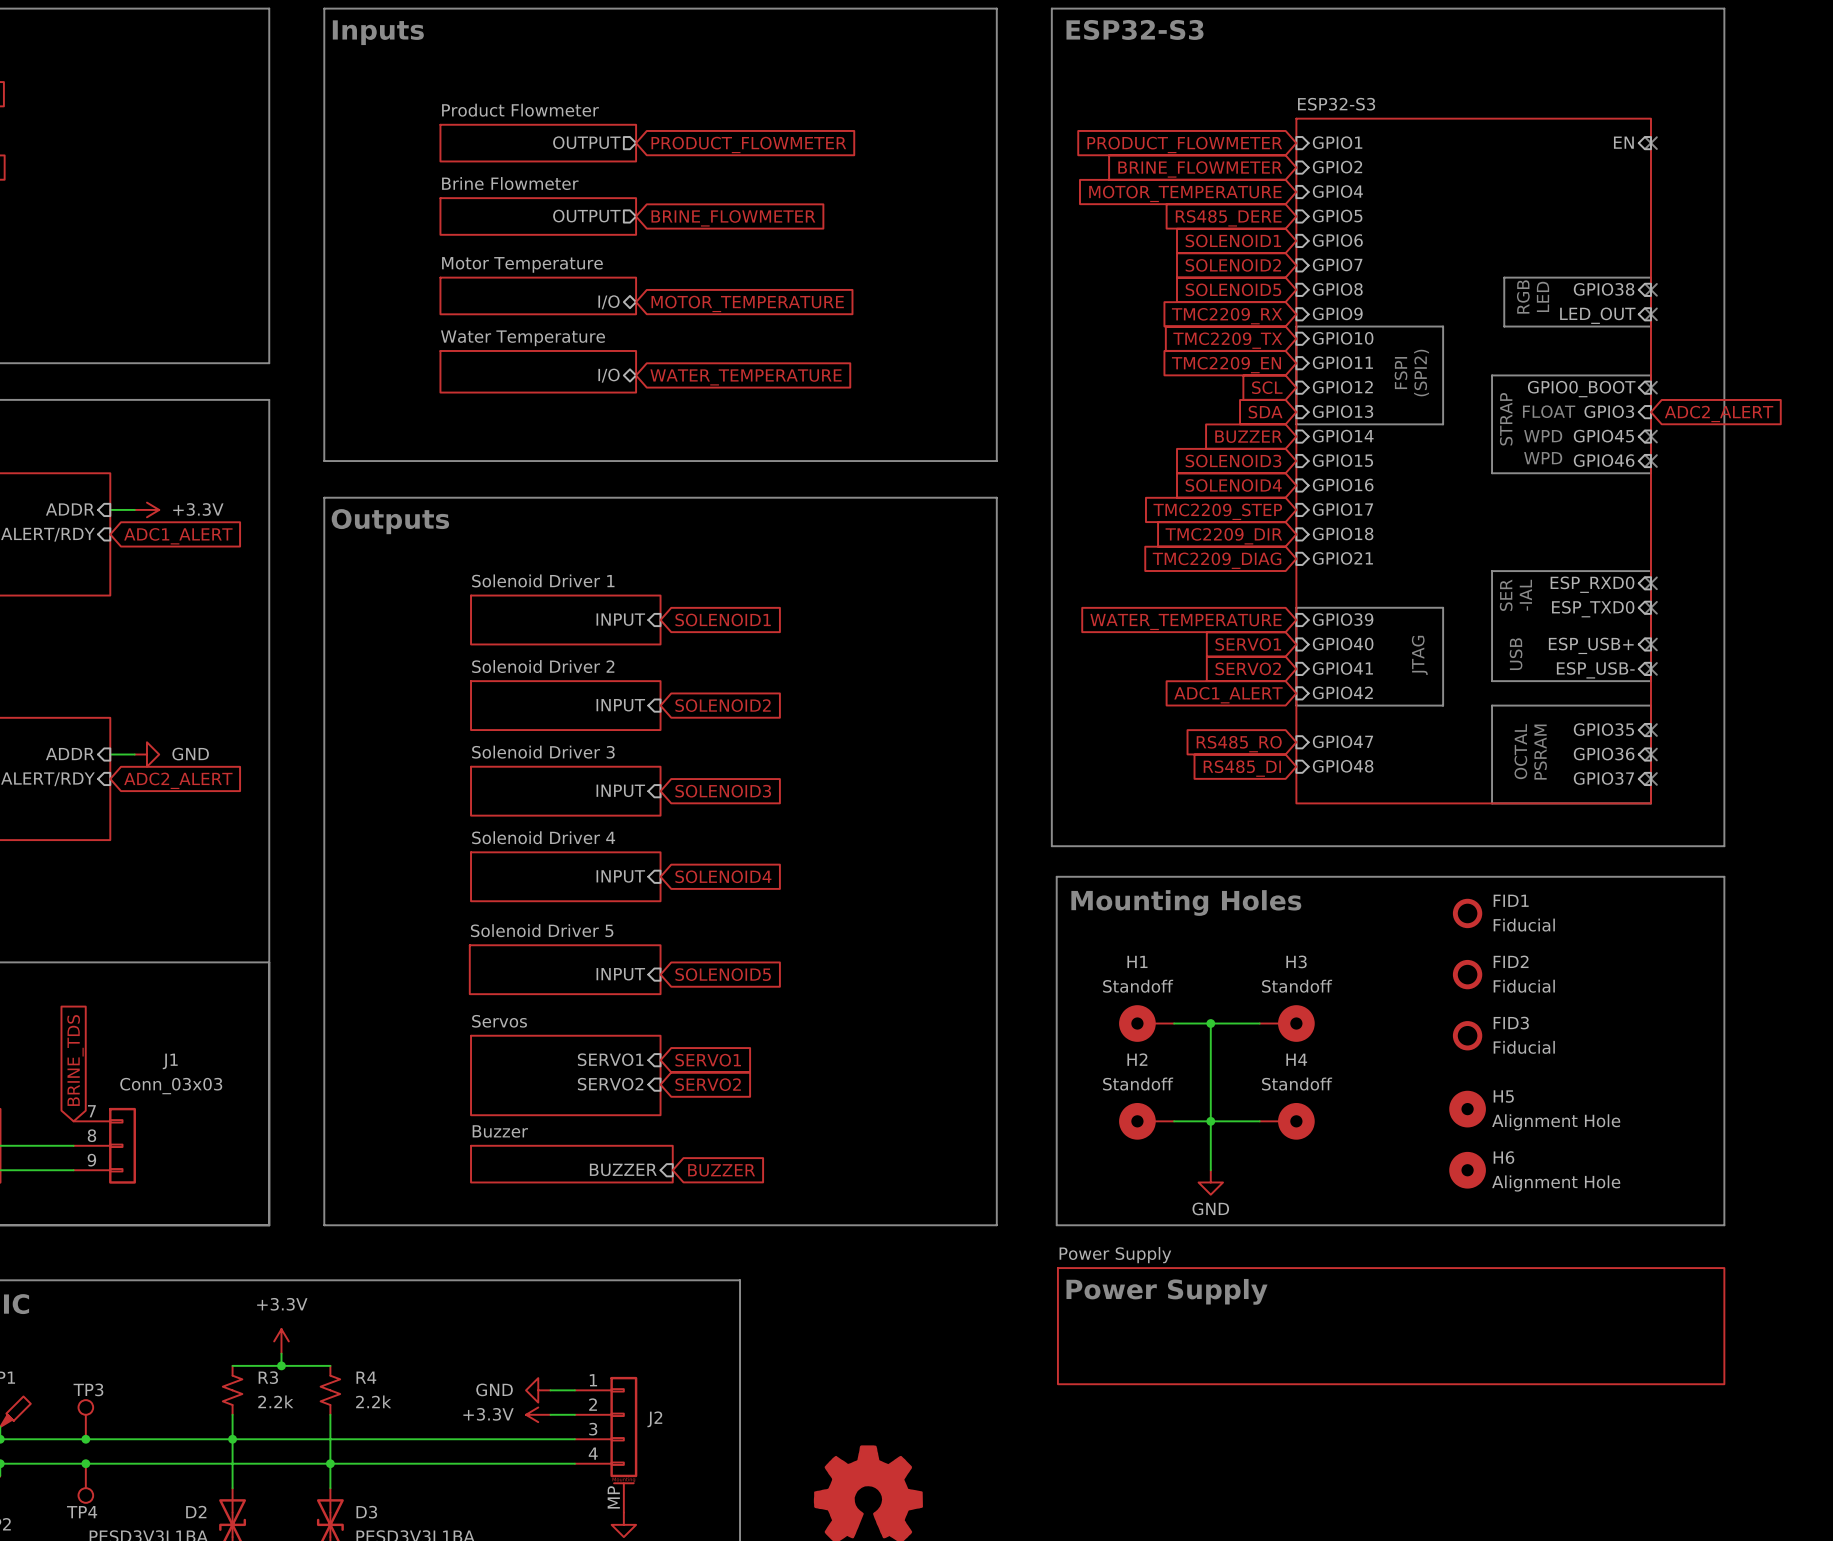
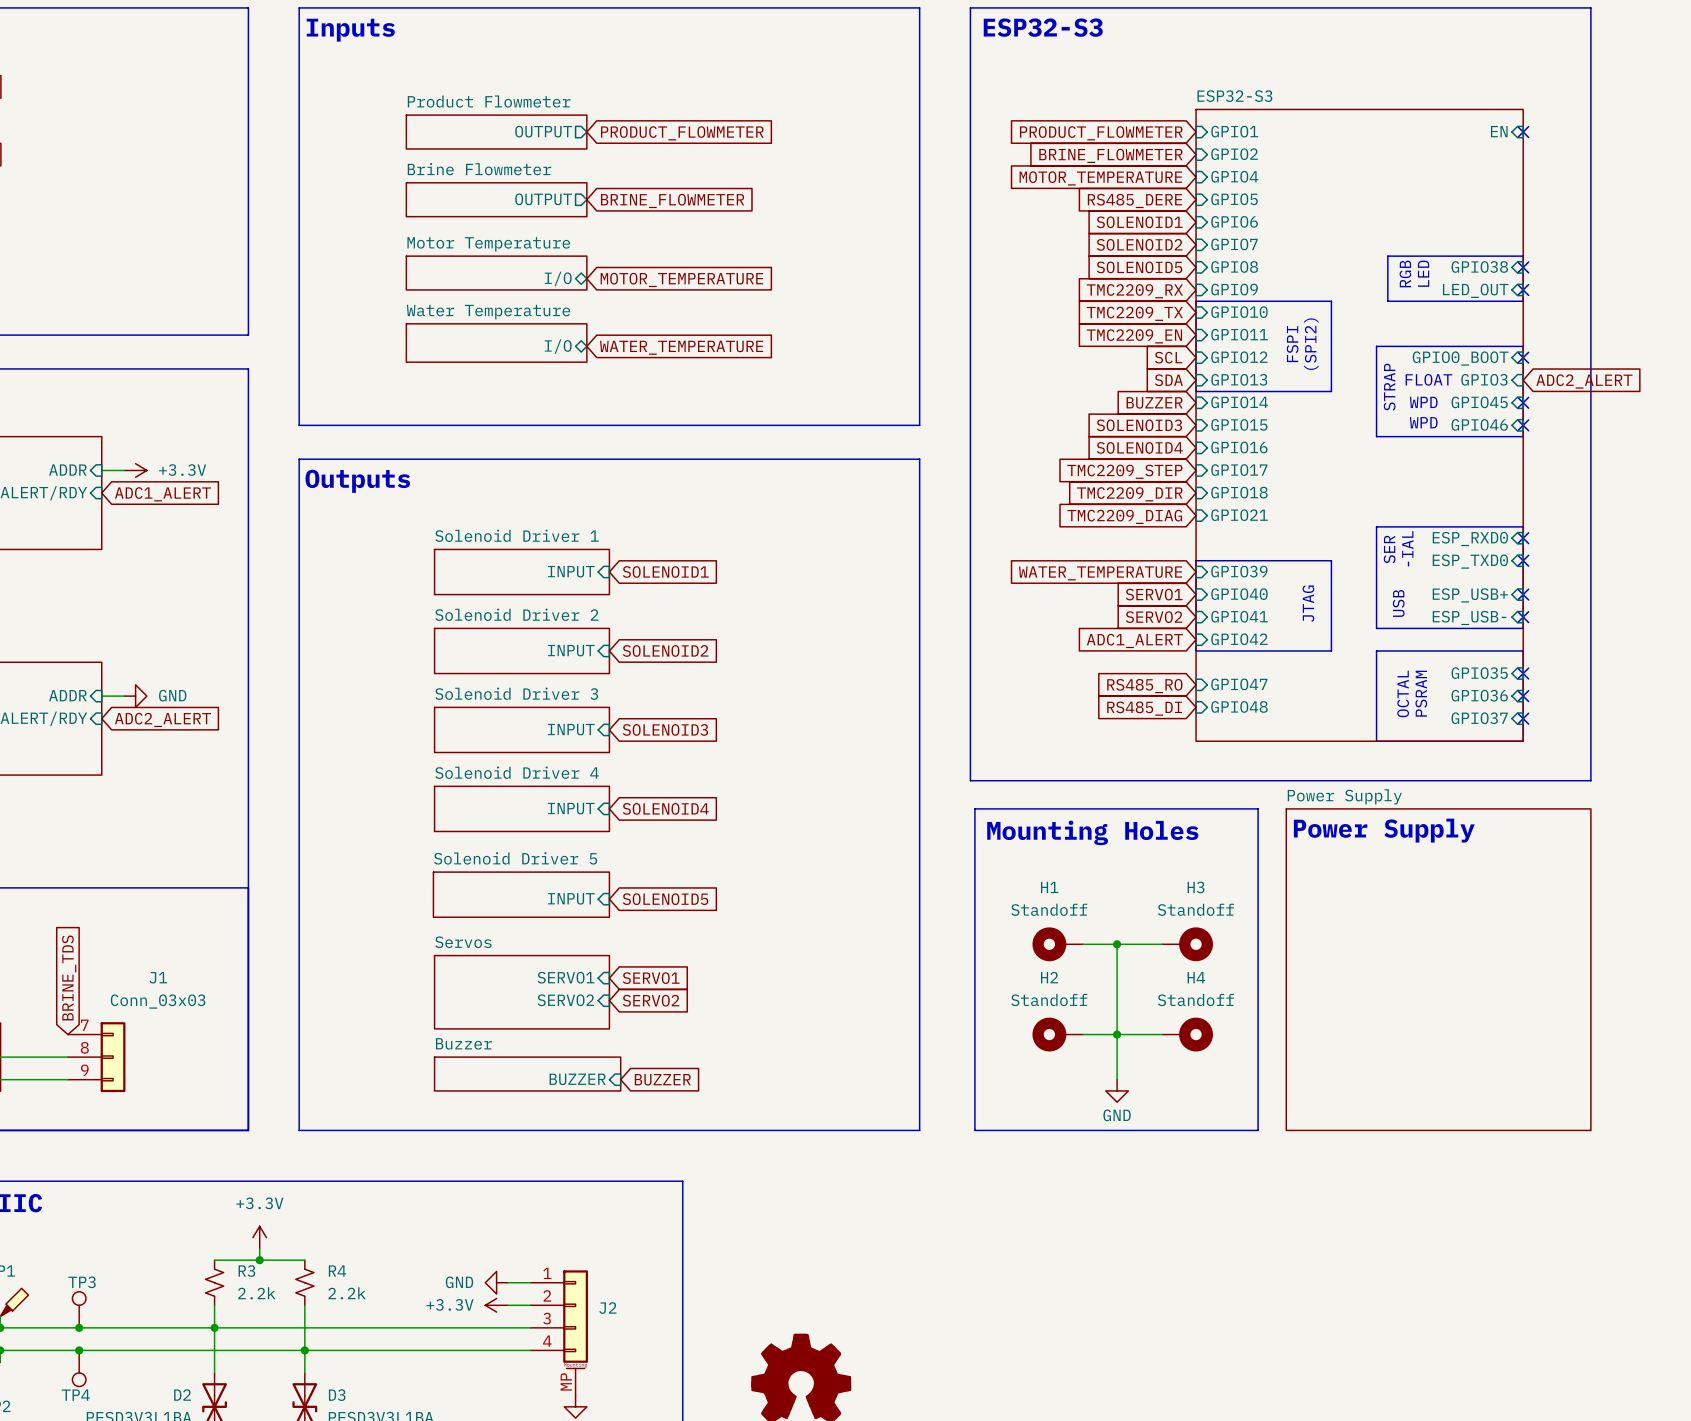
line: (1363, 876) (1724, 876) (1724, 1225) (1363, 1225) -> (1258, 808) (1258, 1130)
text: none -> Power Supply (1384, 830)
FID1: Fiducial (1467, 913) -> none
FID2: Fiducial (1467, 974) -> none
FID3: Fiducial (1467, 1035) -> none
sheet Power Supply: none -> (1438, 969)
H5: Alignment Hole (1467, 1109) -> none
H6: Alignment Hole (1467, 1170) -> none
text: Power Supply (1167, 1291) -> none
sheet Power Supply: (1391, 1326) -> none

